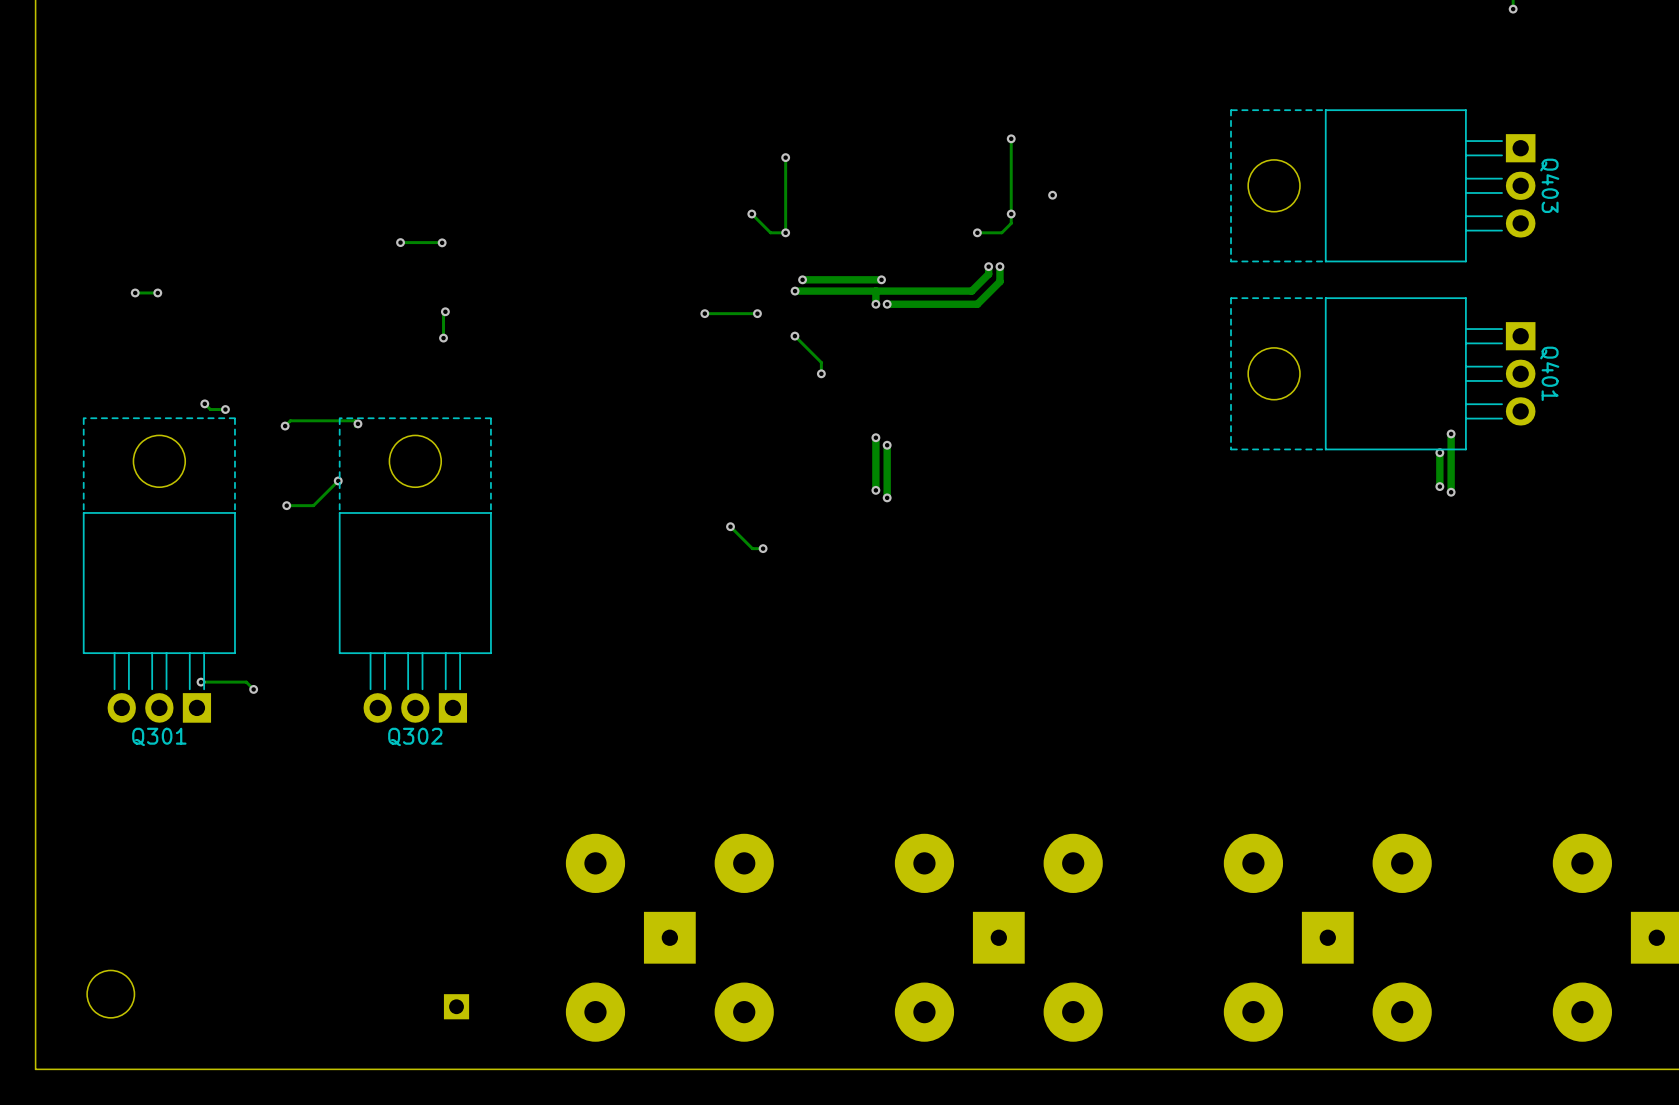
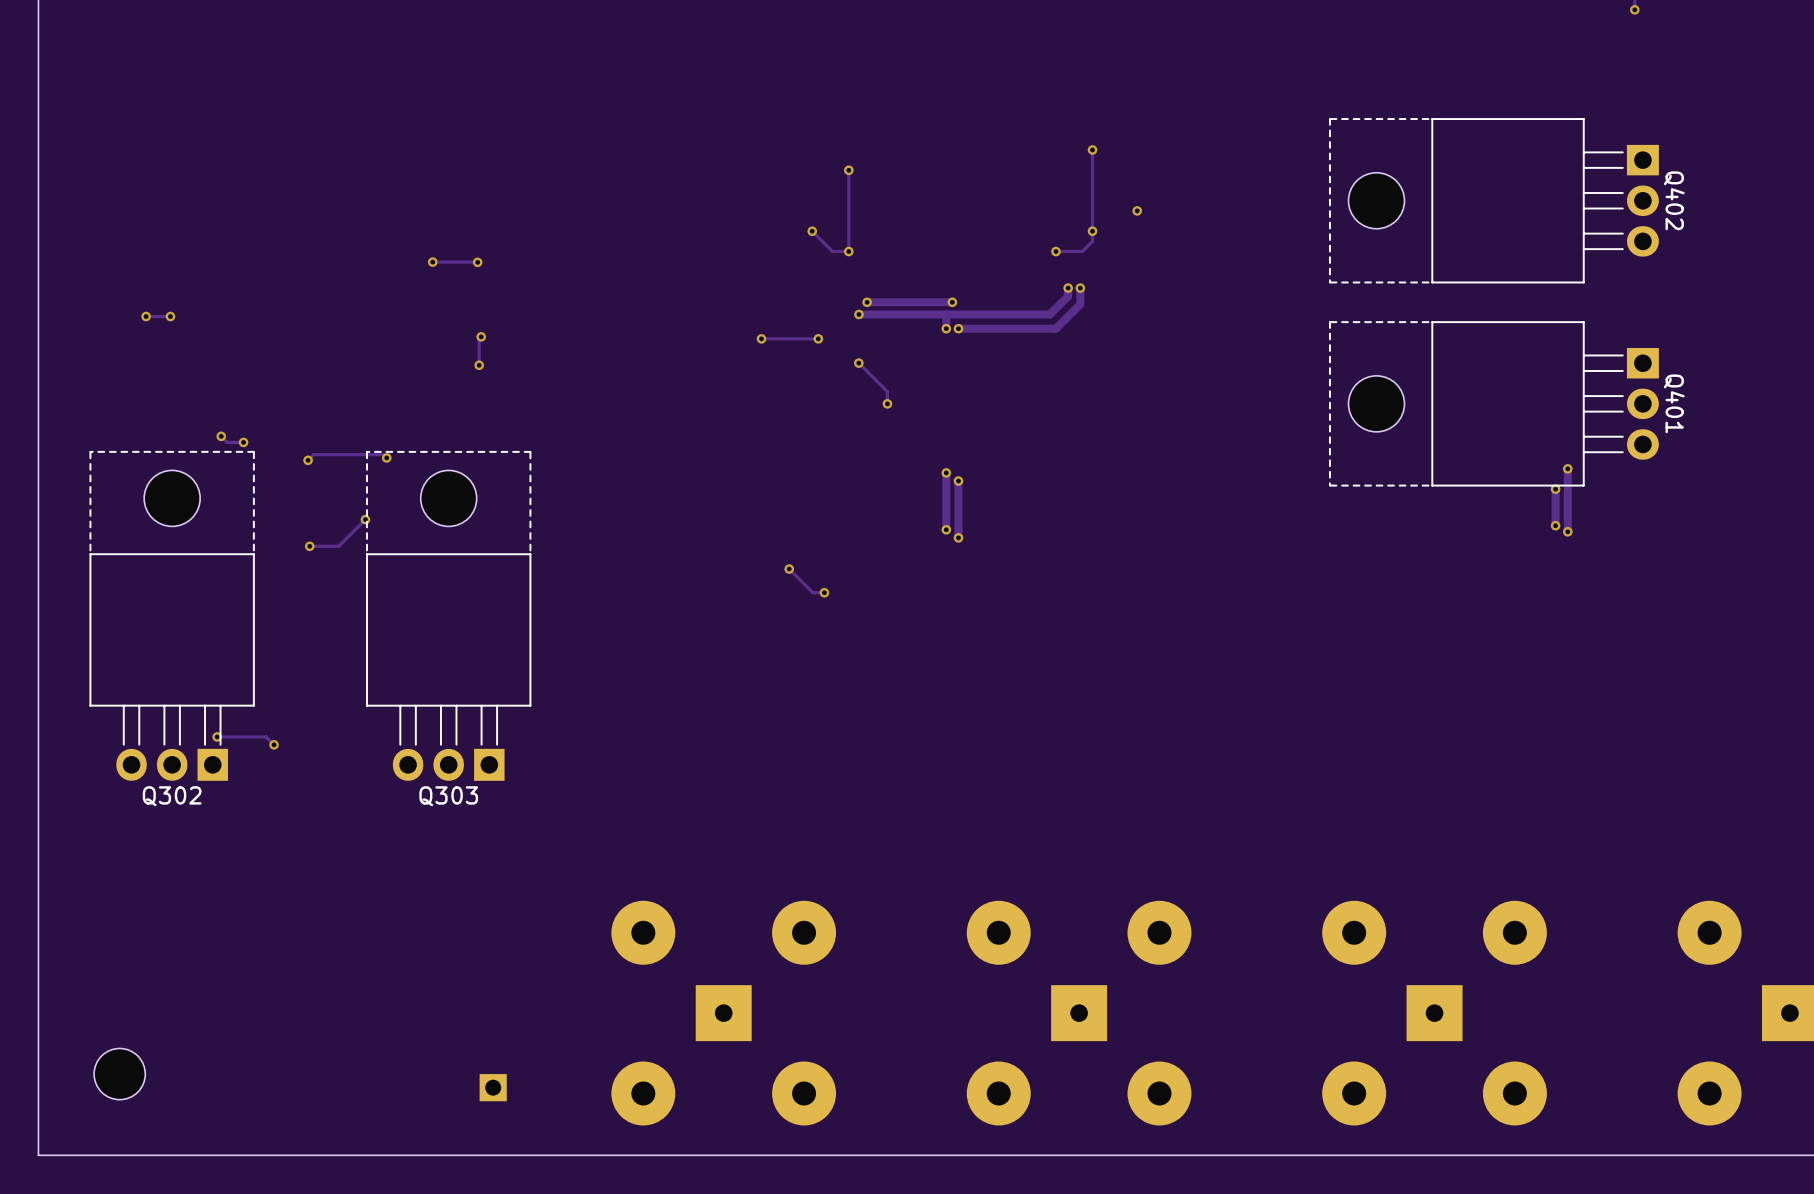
Q403 name: Q403 (1549, 185) -> Q402 (1674, 200)
Q301 name: Q301 (159, 736) -> Q302 (172, 796)
Q302 name: Q302 (415, 736) -> Q303 (448, 796)

